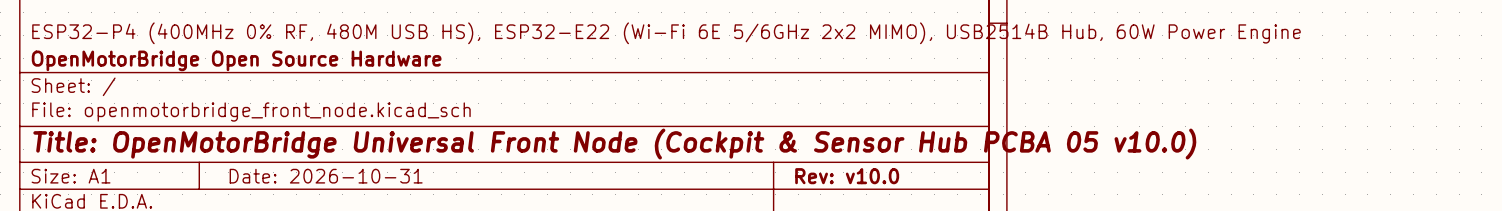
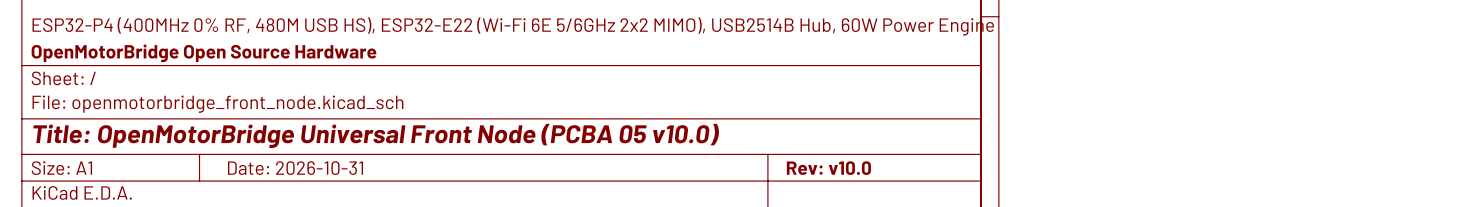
title block: Title: OpenMotorBridge Universal Front Node (Cockpit & Sensor Hub PCBA 05 v10.0) (614, 144) -> Title: OpenMotorBridge Universal Front Node (PCBA 05 v10.0) (376, 135)

